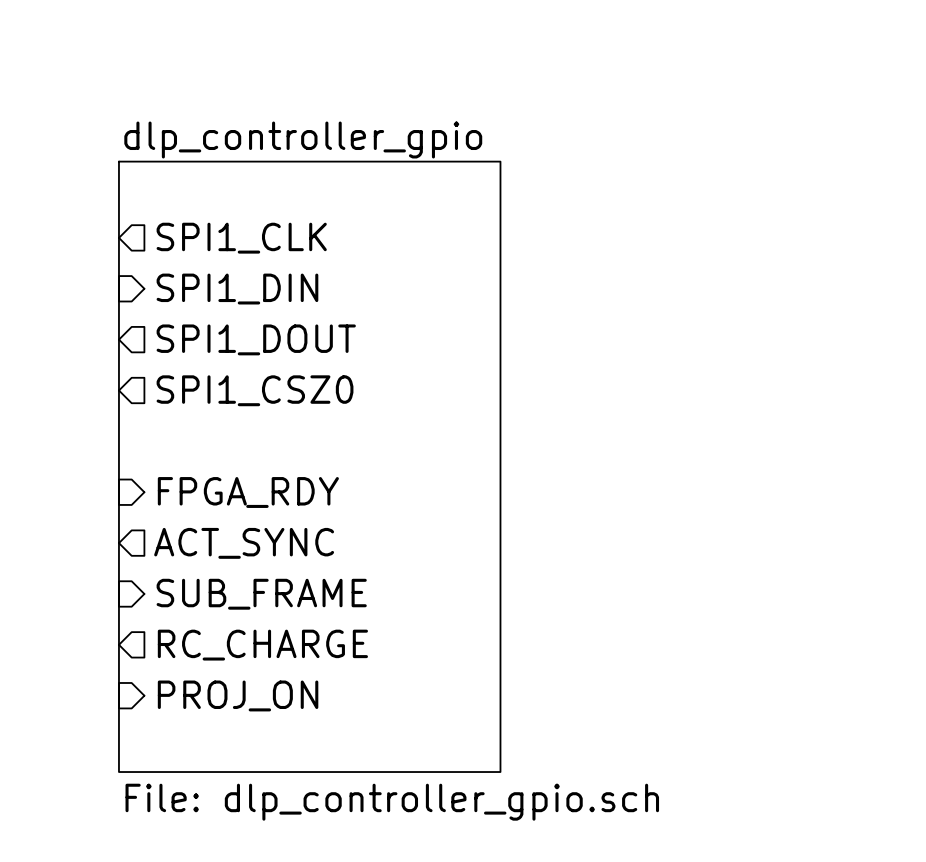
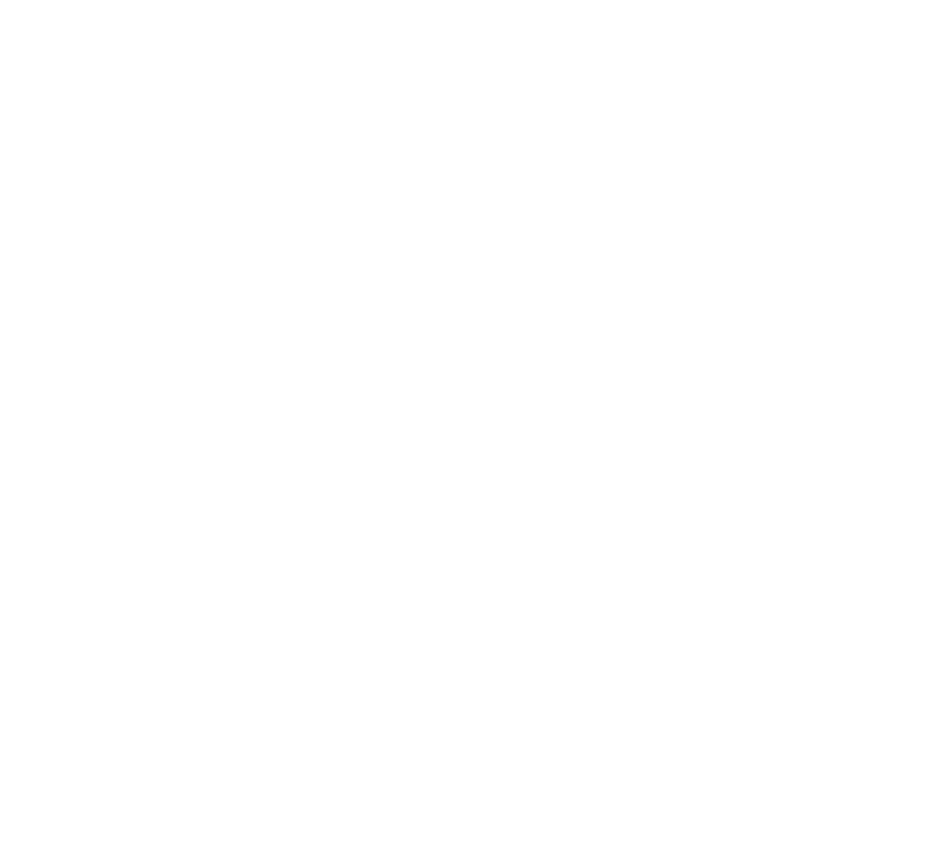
sheet pin: SPI1_CLK (241, 238) -> none
sheet pin: SPI1_DIN (237, 289) -> none
sheet pin: SPI1_DOUT (256, 339) -> none
sheet pin: SPI1_CSZ0 (255, 390) -> none
sheet dlp_controller_gpio: File: dlp_controller_gpio.sch (309, 466) -> none
sheet pin: FPGA_RDY (248, 492) -> none
sheet pin: ACT_SYNC (244, 543) -> none
sheet pin: SUB_FRAME (261, 594) -> none
sheet pin: RC_CHARGE (262, 645) -> none
sheet pin: PROJ_ON (238, 695) -> none

